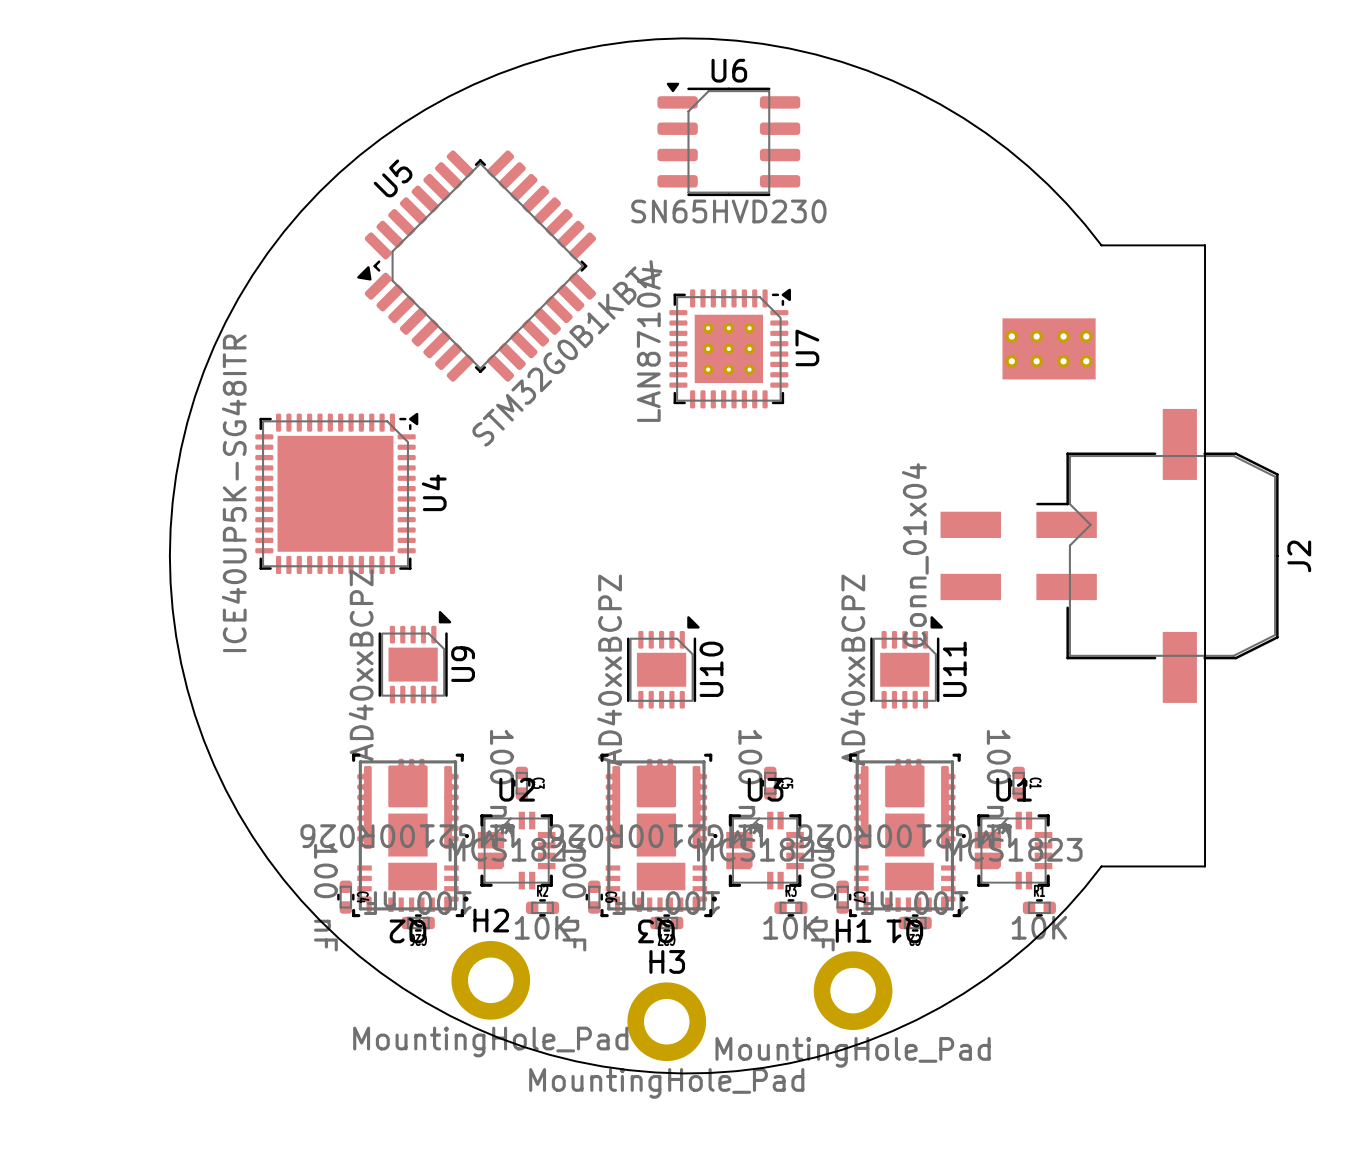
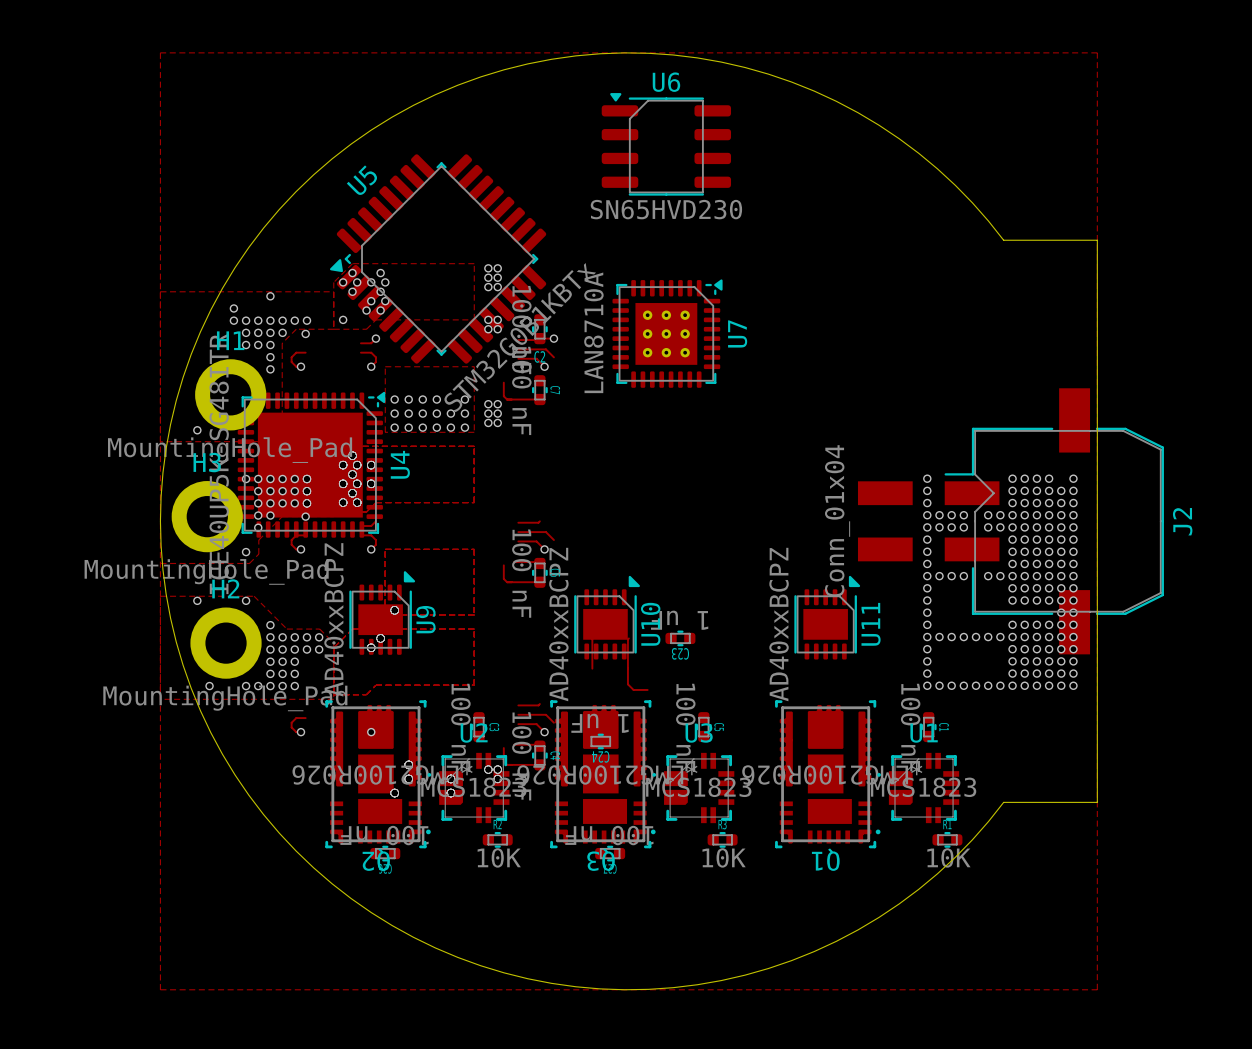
zone outline: none -> (160, 52) (160, 989) (1097, 989) (1097, 52) (160, 52)
via: none -> (488, 268)
via: none -> (497, 268)
via: none -> (352, 273)
via: none -> (380, 273)
via: none -> (488, 277)
via: none -> (497, 277)
via: none -> (343, 282)
via: none -> (357, 282)
via: none -> (371, 282)
via: none -> (385, 282)
via: none -> (488, 287)
via: none -> (497, 287)
zone outline: none -> (160, 291) (333, 291)
via: none -> (352, 291)
via: none -> (380, 291)
via: none -> (270, 296)
via: none -> (371, 301)
via: none -> (385, 301)
via: none -> (233, 308)
via: none -> (366, 310)
via: none -> (380, 310)
via: none -> (343, 319)
via: none -> (488, 319)
via: none -> (497, 319)
via: none -> (233, 320)
via: none -> (246, 320)
via: none -> (258, 320)
via: none -> (270, 320)
via: none -> (282, 320)
via: none -> (294, 320)
via: none -> (306, 320)
zone outline: none -> (333, 329) (333, 282) (352, 263) (474, 263) (474, 319) (375, 319) (366, 329) (296, 329) (282, 343) (282, 418) (258, 441) (160, 441)
via: none -> (488, 329)
via: none -> (497, 329)
via: none -> (246, 332)
via: none -> (258, 332)
via: none -> (270, 332)
via: none -> (282, 332)
via: none -> (305, 333)
part: (1049, 348) -> none
track: none -> (375, 338) (371, 343) (360, 343)
via: none -> (375, 338)
track: none -> (553, 338) (518, 340)
via: none -> (553, 338)
via: none -> (246, 345)
via: none -> (258, 345)
via: none -> (270, 345)
track: none -> (518, 349) (545, 349) (553, 357)
track: none -> (305, 352) (296, 352) (291, 357) (291, 362) (296, 366) (300, 366)
track: none -> (360, 352) (371, 352) (375, 357) (375, 362) (371, 366)
via: none -> (270, 357)
track: none -> (518, 358) (536, 358) (544, 366)
via: none -> (300, 366)
via: none -> (371, 366)
zone outline: none -> (385, 366) (385, 432) (474, 432) (474, 366) (385, 366)
via: none -> (544, 366)
via: none -> (270, 369)
track: none -> (503, 382) (503, 396) (507, 399) (539, 399)
via: none -> (394, 399)
via: none -> (408, 399)
via: none -> (422, 399)
via: none -> (436, 399)
via: none -> (464, 399)
via: none -> (488, 404)
via: none -> (497, 404)
via: none -> (394, 413)
via: none -> (408, 413)
via: none -> (422, 413)
via: none -> (436, 413)
via: none -> (450, 413)
via: none -> (464, 413)
via: none -> (488, 413)
via: none -> (497, 413)
via: none -> (488, 422)
via: none -> (497, 422)
via: none -> (394, 427)
via: none -> (408, 427)
via: none -> (422, 427)
via: none -> (436, 427)
via: none -> (450, 427)
via: none -> (464, 427)
via: none -> (197, 430)
via: none -> (352, 455)
via: none -> (343, 465)
via: none -> (357, 465)
via: none -> (371, 465)
via: none -> (352, 474)
via: none -> (927, 478)
via: none -> (1012, 478)
via: none -> (1024, 478)
via: none -> (1036, 478)
via: none -> (1049, 478)
via: none -> (1073, 478)
via: none -> (246, 479)
via: none -> (258, 479)
via: none -> (270, 479)
via: none -> (282, 479)
via: none -> (294, 479)
via: none -> (306, 479)
via: none -> (343, 483)
via: none -> (357, 483)
via: none -> (371, 483)
via: none -> (258, 491)
via: none -> (270, 491)
via: none -> (282, 491)
via: none -> (294, 491)
via: none -> (306, 491)
via: none -> (927, 490)
via: none -> (1012, 490)
via: none -> (1024, 490)
via: none -> (1036, 490)
via: none -> (1049, 490)
via: none -> (1061, 490)
via: none -> (1073, 490)
via: none -> (352, 493)
via: none -> (343, 502)
via: none -> (357, 502)
via: none -> (927, 503)
via: none -> (1012, 503)
via: none -> (1024, 503)
via: none -> (1036, 503)
via: none -> (1049, 503)
via: none -> (1061, 503)
via: none -> (1073, 503)
via: none -> (258, 503)
via: none -> (270, 503)
via: none -> (282, 503)
via: none -> (294, 503)
via: none -> (306, 503)
zone outline: none -> (333, 511) (366, 511) (375, 502) (474, 502) (474, 446) (352, 446) (333, 465) (333, 516) (282, 516) (258, 540) (258, 554) (249, 563) (160, 563)
via: none -> (258, 515)
via: none -> (270, 515)
via: none -> (927, 515)
via: none -> (939, 515)
via: none -> (951, 515)
via: none -> (963, 515)
via: none -> (988, 515)
via: none -> (1000, 515)
via: none -> (1012, 515)
via: none -> (1024, 515)
via: none -> (1036, 515)
via: none -> (1049, 515)
via: none -> (1061, 515)
via: none -> (1073, 515)
via: none -> (305, 516)
track: none -> (375, 521) (371, 526) (360, 526)
track: none -> (539, 521) (518, 522)
via: none -> (258, 527)
via: none -> (927, 527)
via: none -> (939, 527)
via: none -> (951, 527)
via: none -> (963, 527)
via: none -> (988, 527)
via: none -> (1000, 527)
via: none -> (1012, 527)
via: none -> (1024, 527)
via: none -> (1036, 527)
via: none -> (1049, 527)
via: none -> (1061, 527)
via: none -> (1073, 527)
track: none -> (518, 532) (545, 532) (553, 540)
track: none -> (305, 535) (296, 535) (291, 540) (291, 544) (296, 549) (300, 549)
track: none -> (360, 535) (371, 535) (375, 540) (375, 544) (371, 549)
via: none -> (927, 539)
via: none -> (1012, 539)
via: none -> (1024, 539)
via: none -> (1036, 539)
via: none -> (1049, 539)
via: none -> (1061, 539)
via: none -> (1073, 539)
track: none -> (518, 541) (536, 541) (544, 549)
via: none -> (300, 549)
via: none -> (371, 549)
zone outline: none -> (385, 549) (474, 549) (474, 615) (385, 615) (385, 549)
via: none -> (544, 549)
via: none -> (246, 552)
via: none -> (927, 551)
via: none -> (1012, 551)
via: none -> (1024, 551)
via: none -> (1036, 551)
via: none -> (1049, 551)
via: none -> (1061, 551)
via: none -> (1073, 551)
track: none -> (514, 562) (539, 563)
via: none -> (927, 563)
via: none -> (1012, 563)
via: none -> (1024, 563)
via: none -> (1036, 563)
via: none -> (1049, 563)
via: none -> (1061, 563)
via: none -> (1073, 563)
track: none -> (503, 565) (503, 578) (507, 582) (539, 582)
via: none -> (927, 576)
via: none -> (939, 576)
via: none -> (951, 576)
via: none -> (963, 576)
via: none -> (988, 576)
via: none -> (1000, 576)
via: none -> (1012, 576)
via: none -> (1024, 576)
via: none -> (1036, 576)
via: none -> (1049, 576)
via: none -> (1061, 576)
via: none -> (1073, 576)
via: none -> (927, 588)
via: none -> (1012, 588)
via: none -> (1024, 588)
via: none -> (1036, 588)
via: none -> (1049, 588)
via: none -> (1061, 588)
via: none -> (1073, 588)
zone outline: none -> (160, 596) (254, 596) (286, 629) (319, 629) (333, 643) (333, 699) (160, 699)
via: none -> (197, 600)
via: none -> (246, 600)
via: none -> (927, 600)
via: none -> (1012, 600)
via: none -> (1024, 600)
via: none -> (1036, 600)
via: none -> (1049, 600)
via: none -> (1061, 600)
via: none -> (1073, 600)
via: none -> (394, 610)
via: none -> (927, 612)
via: none -> (1061, 612)
via: none -> (1073, 612)
via: none -> (270, 625)
via: none -> (927, 624)
via: none -> (1012, 624)
via: none -> (1024, 624)
via: none -> (1036, 624)
via: none -> (1049, 624)
via: none -> (1061, 624)
via: none -> (1073, 624)
via: none -> (927, 637)
via: none -> (939, 637)
via: none -> (951, 637)
via: none -> (963, 637)
via: none -> (976, 637)
via: none -> (988, 637)
via: none -> (1000, 637)
via: none -> (1012, 637)
via: none -> (1024, 637)
via: none -> (1036, 637)
via: none -> (1049, 637)
via: none -> (1061, 637)
via: none -> (1073, 637)
via: none -> (270, 637)
via: none -> (282, 637)
via: none -> (294, 637)
via: none -> (306, 637)
via: none -> (319, 637)
via: none -> (380, 638)
track: none -> (591, 638) (592, 668)
track: none -> (628, 638) (627, 684) (633, 689) (647, 689)
C23: none -> 1 uF (680, 638)
zone outline: none -> (333, 647) (352, 629) (474, 629) (474, 685) (375, 685) (366, 694) (333, 694)
via: none -> (371, 647)
via: none -> (270, 649)
via: none -> (282, 649)
via: none -> (294, 649)
via: none -> (306, 649)
via: none -> (319, 649)
via: none -> (927, 649)
via: none -> (1012, 649)
via: none -> (1024, 649)
via: none -> (1036, 649)
via: none -> (1049, 649)
via: none -> (1061, 649)
via: none -> (1073, 649)
via: none -> (927, 661)
via: none -> (1012, 661)
via: none -> (1024, 661)
via: none -> (1036, 661)
via: none -> (1049, 661)
via: none -> (1061, 661)
via: none -> (1073, 661)
via: none -> (270, 661)
via: none -> (282, 661)
via: none -> (294, 661)
via: none -> (270, 673)
via: none -> (282, 673)
via: none -> (294, 673)
via: none -> (927, 673)
via: none -> (1012, 673)
via: none -> (1024, 673)
via: none -> (1036, 673)
via: none -> (1049, 673)
via: none -> (1061, 673)
via: none -> (1073, 673)
via: none -> (209, 686)
via: none -> (246, 686)
via: none -> (258, 686)
via: none -> (270, 686)
via: none -> (282, 686)
via: none -> (294, 686)
via: none -> (927, 685)
via: none -> (939, 685)
via: none -> (951, 685)
via: none -> (963, 685)
via: none -> (976, 685)
via: none -> (988, 685)
via: none -> (1000, 685)
via: none -> (1012, 685)
via: none -> (1024, 685)
via: none -> (1036, 685)
via: none -> (1049, 685)
via: none -> (1061, 685)
via: none -> (1073, 685)
track: none -> (539, 704) (518, 705)
track: none -> (518, 714) (545, 714) (553, 722)
track: none -> (305, 718) (296, 718) (291, 722) (291, 727) (296, 732) (300, 732)
track: none -> (518, 724) (536, 724) (544, 732)
via: none -> (300, 732)
via: none -> (371, 732)
via: none -> (544, 732)
C24: none -> 1 uF (600, 741)
track: none -> (514, 744) (539, 746)
track: none -> (503, 748) (503, 761) (507, 764) (539, 764)
via: none -> (408, 764)
via: none -> (488, 769)
via: none -> (497, 769)
via: none -> (408, 778)
via: none -> (450, 778)
via: none -> (497, 778)
via: none -> (394, 793)
via: none -> (450, 793)
C4 position: (345, 897) -> (539, 755)
C6 position: (594, 897) -> (539, 572)
C7 position: (842, 897) -> (539, 390)
C2 rotation: 0° (915, 923) -> 90° clockwise (539, 329)
C2 position: (915, 923) -> (539, 329)
H2 position: (490, 980) -> (226, 643)
H1 position: (853, 990) -> (230, 394)
H3 position: (666, 1021) -> (207, 516)

